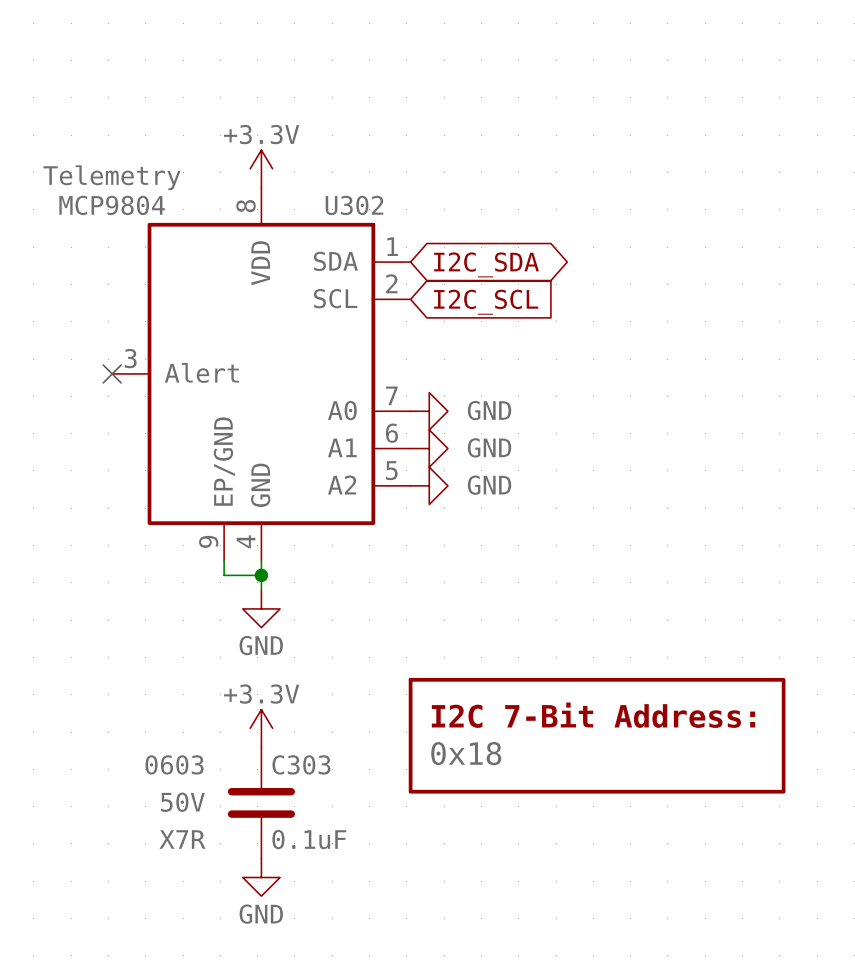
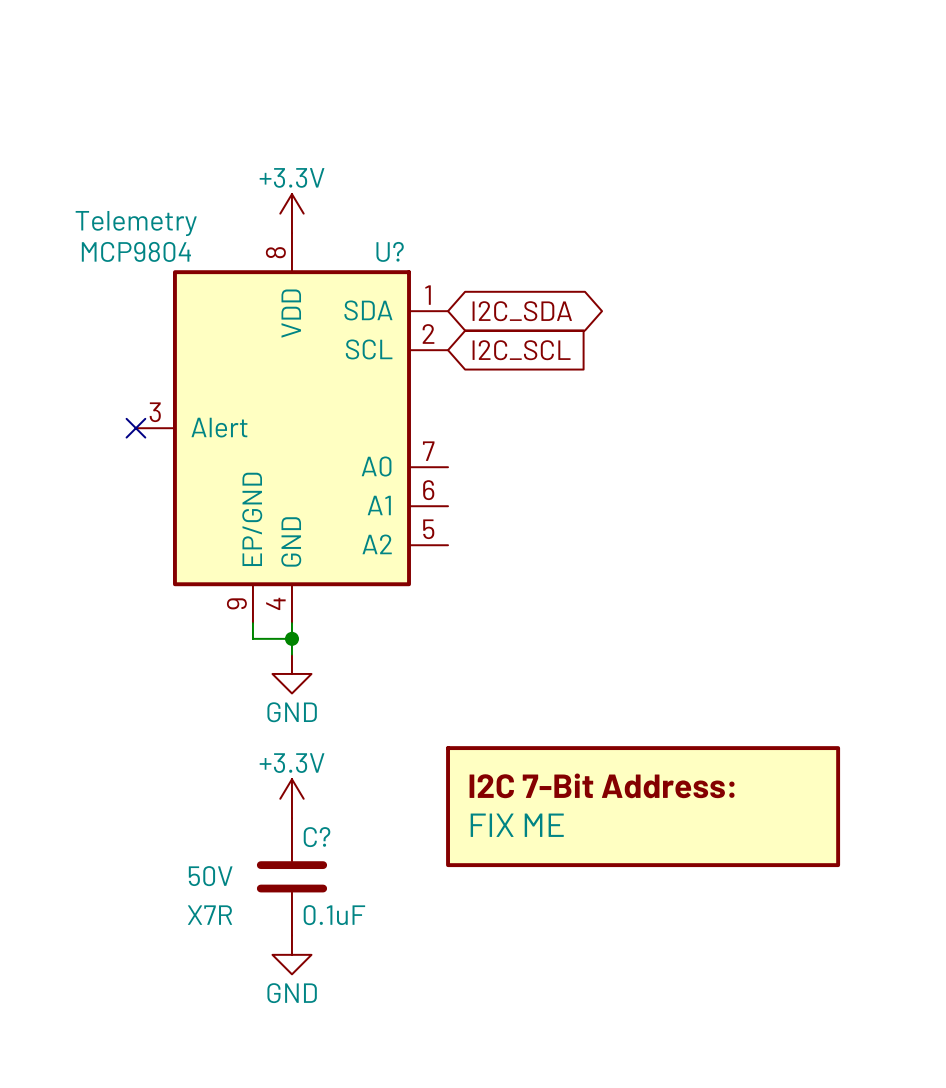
U302 name: U302 (354, 205) -> U? (390, 251)
power symbol: GND (429, 411) -> none
power symbol: GND (429, 448) -> none
power symbol: GND (429, 485) -> none
part value: 0x18 (466, 753) -> FIX ME (517, 825)
C303 text: 0603 (174, 764) -> none
C303 name: C303 (301, 764) -> C? (317, 837)

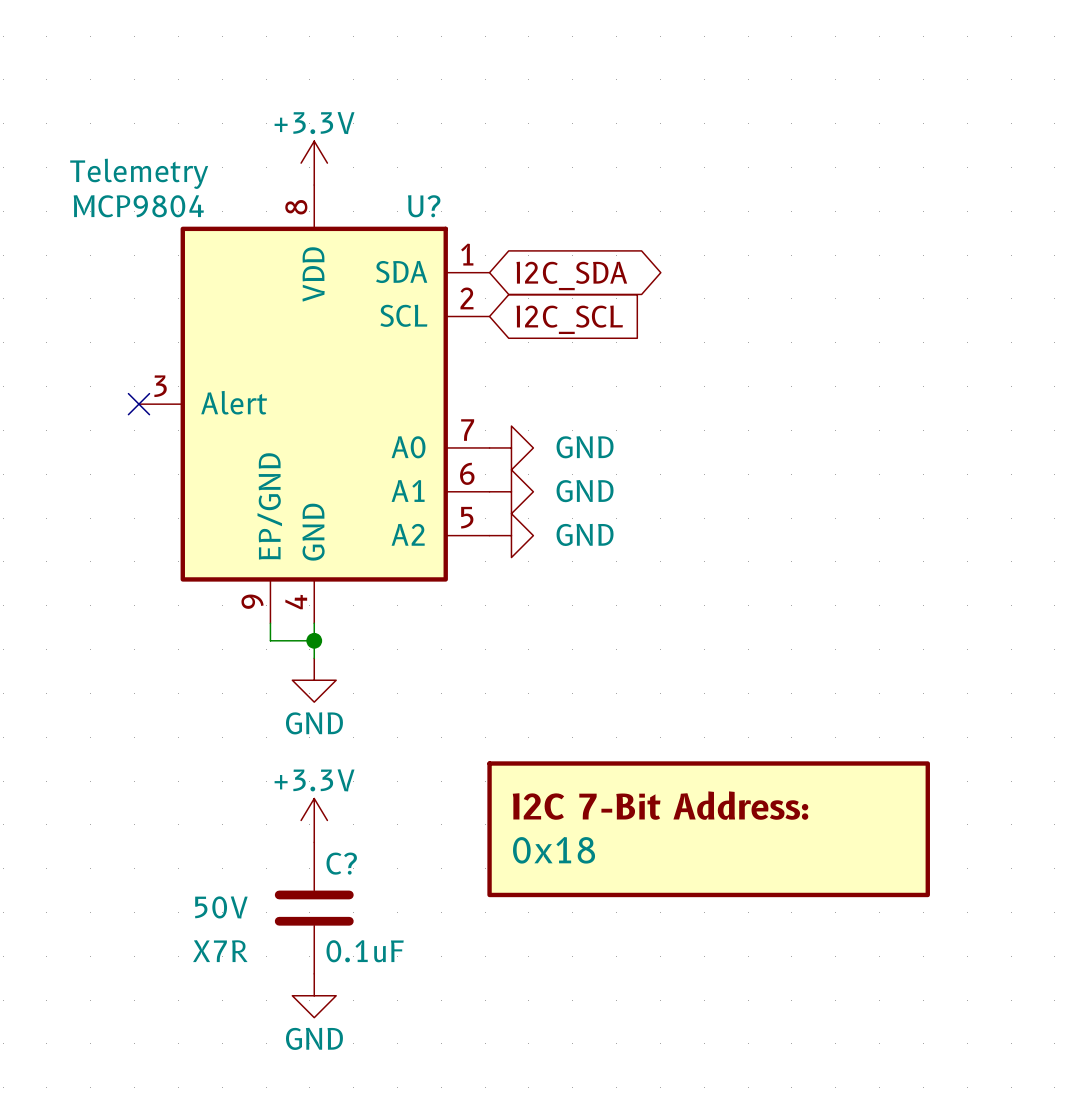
power symbol: none -> GND (511, 447)
power symbol: none -> GND (511, 491)
power symbol: none -> GND (511, 535)
part value: FIX ME (517, 825) -> 0x18 (554, 850)

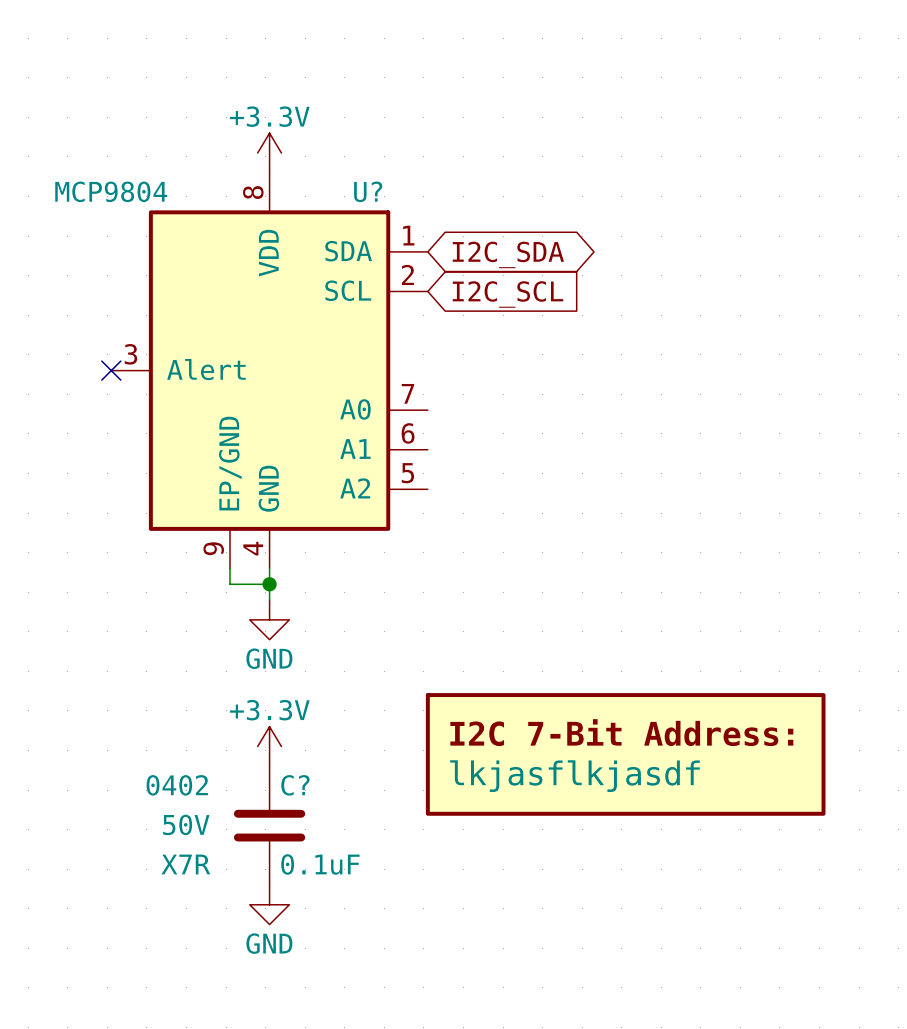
U? text: Telemetry (139, 173) -> none
power symbol: GND (511, 447) -> none
power symbol: GND (511, 491) -> none
power symbol: GND (511, 535) -> none
part value: 0x18 (554, 850) -> lkjasflkjasdf (574, 776)
C? text: none -> 0402 (177, 785)

